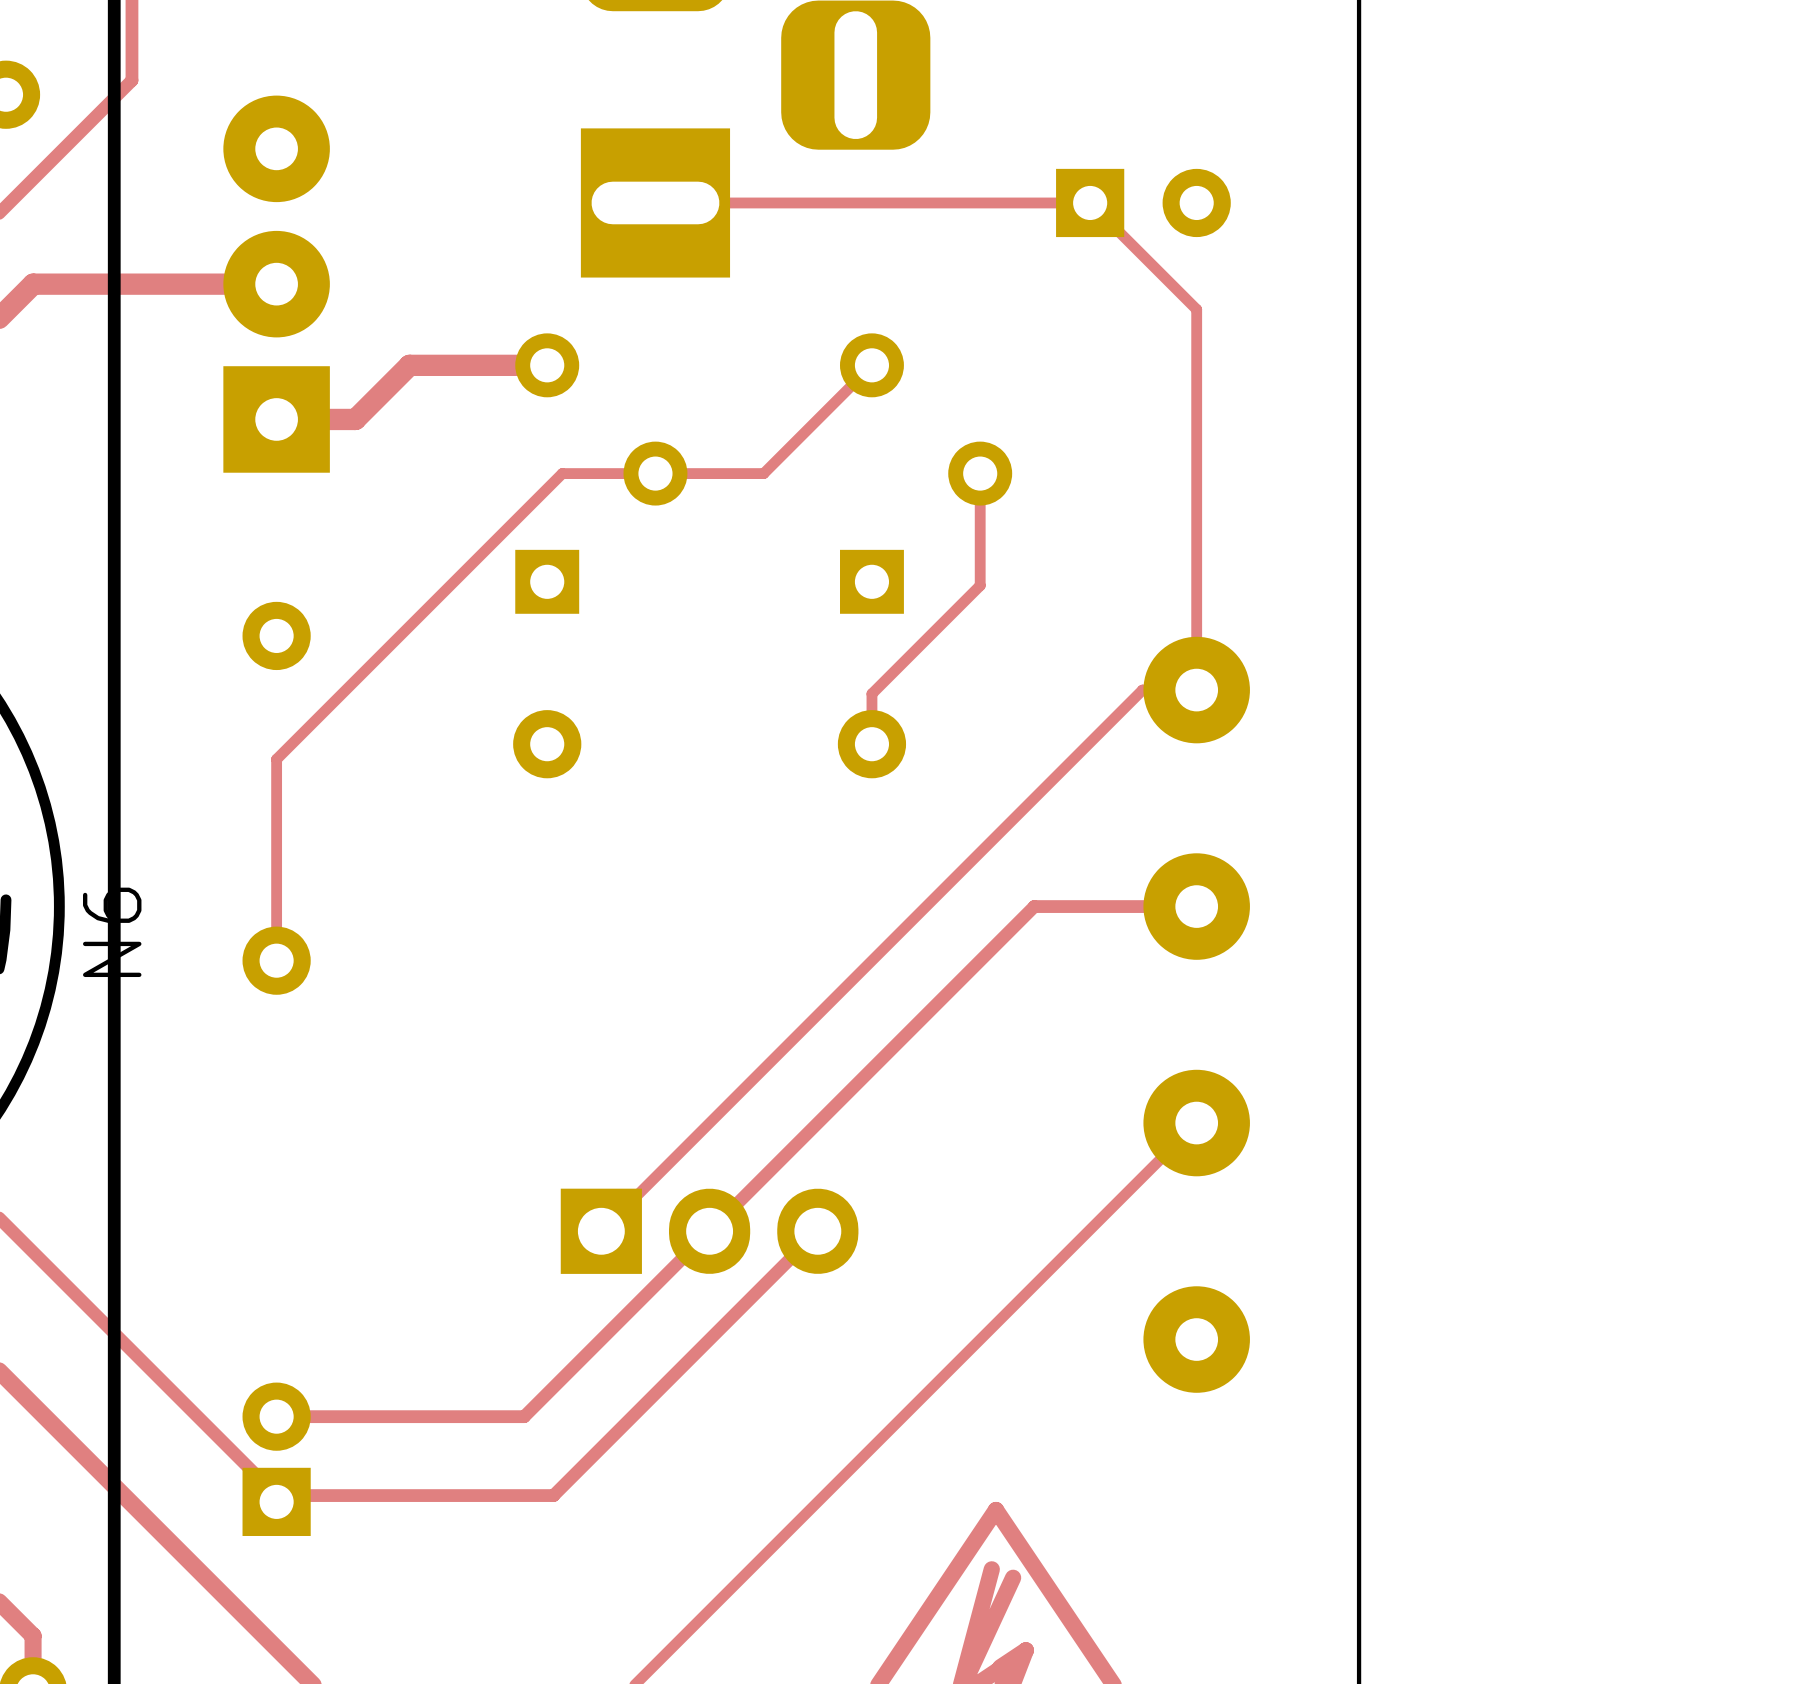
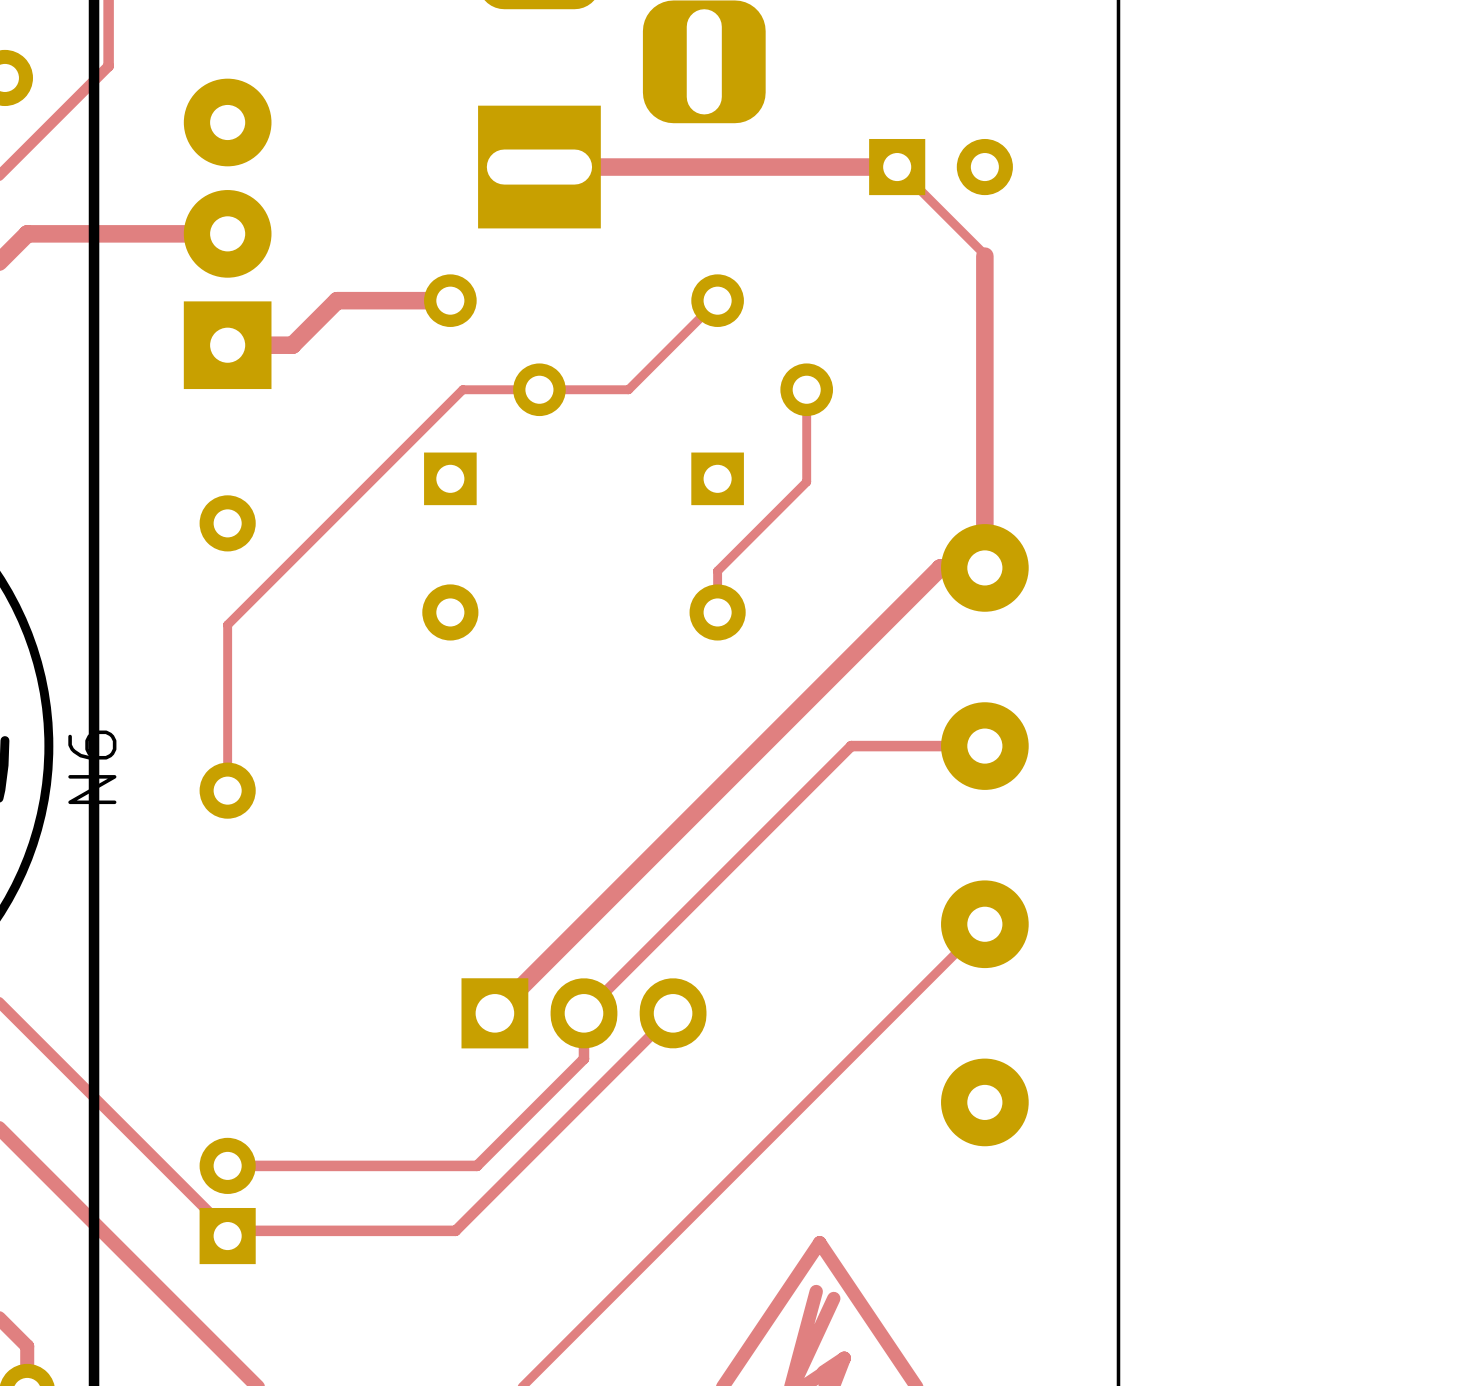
track width: thin (655, 202) (1090, 202) -> thick (539, 167) (897, 167)
track width: thin (1196, 311) (1196, 690) (1142, 690) (601, 1231) -> thick (984, 256) (984, 567) (940, 567) (494, 1013)
track: (709, 1231) (524, 1416) -> (583, 1013) (583, 1058) (477, 1165) (431, 1165)

